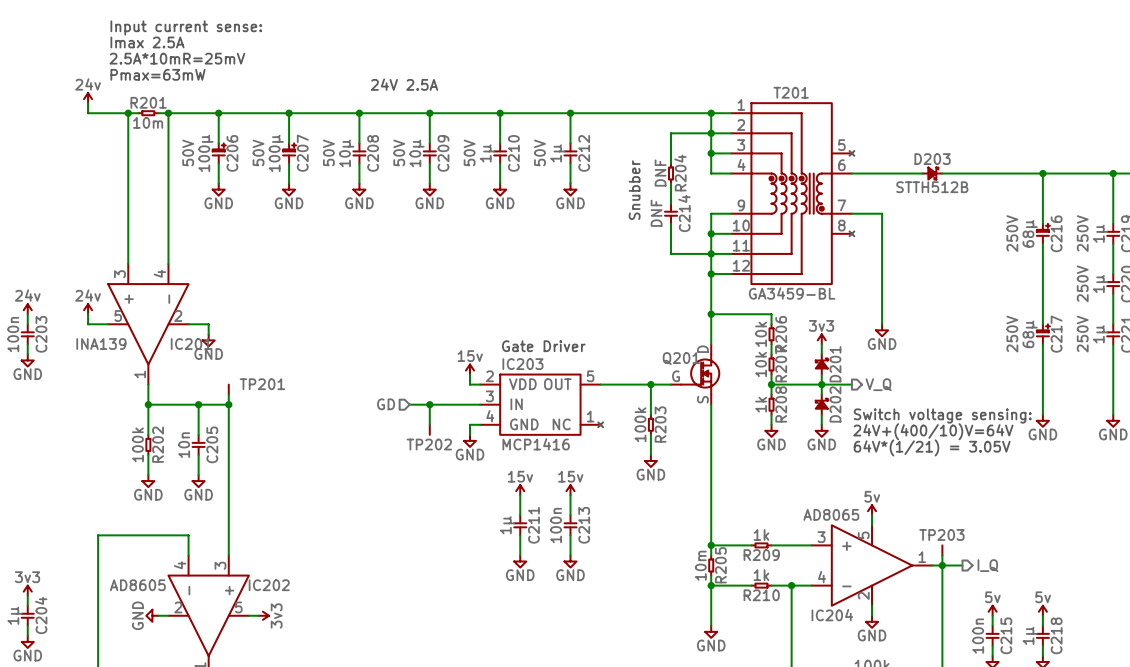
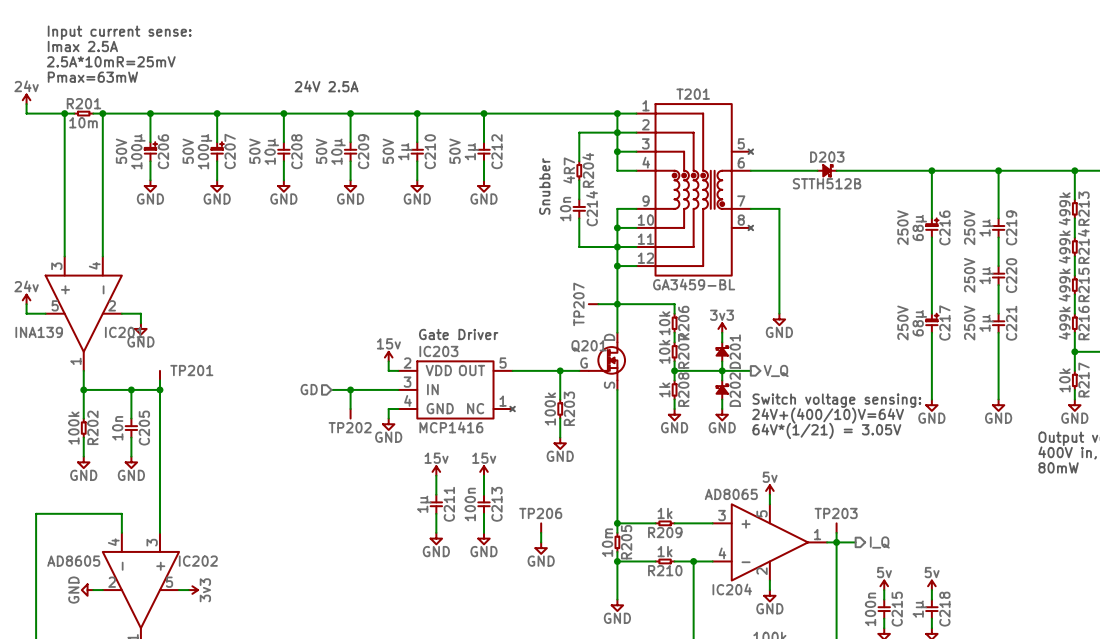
R204 value: DNF (660, 173) -> 4R7 (569, 170)
C214 value: DNF (656, 213) -> 10n (565, 209)
TP207: none -> (591, 304)
wire: none -> (598, 304) (617, 304)
TP206: none -> (541, 525)
wire: none -> (541, 532) (541, 542)
power symbol: none -> GND (541, 548)

